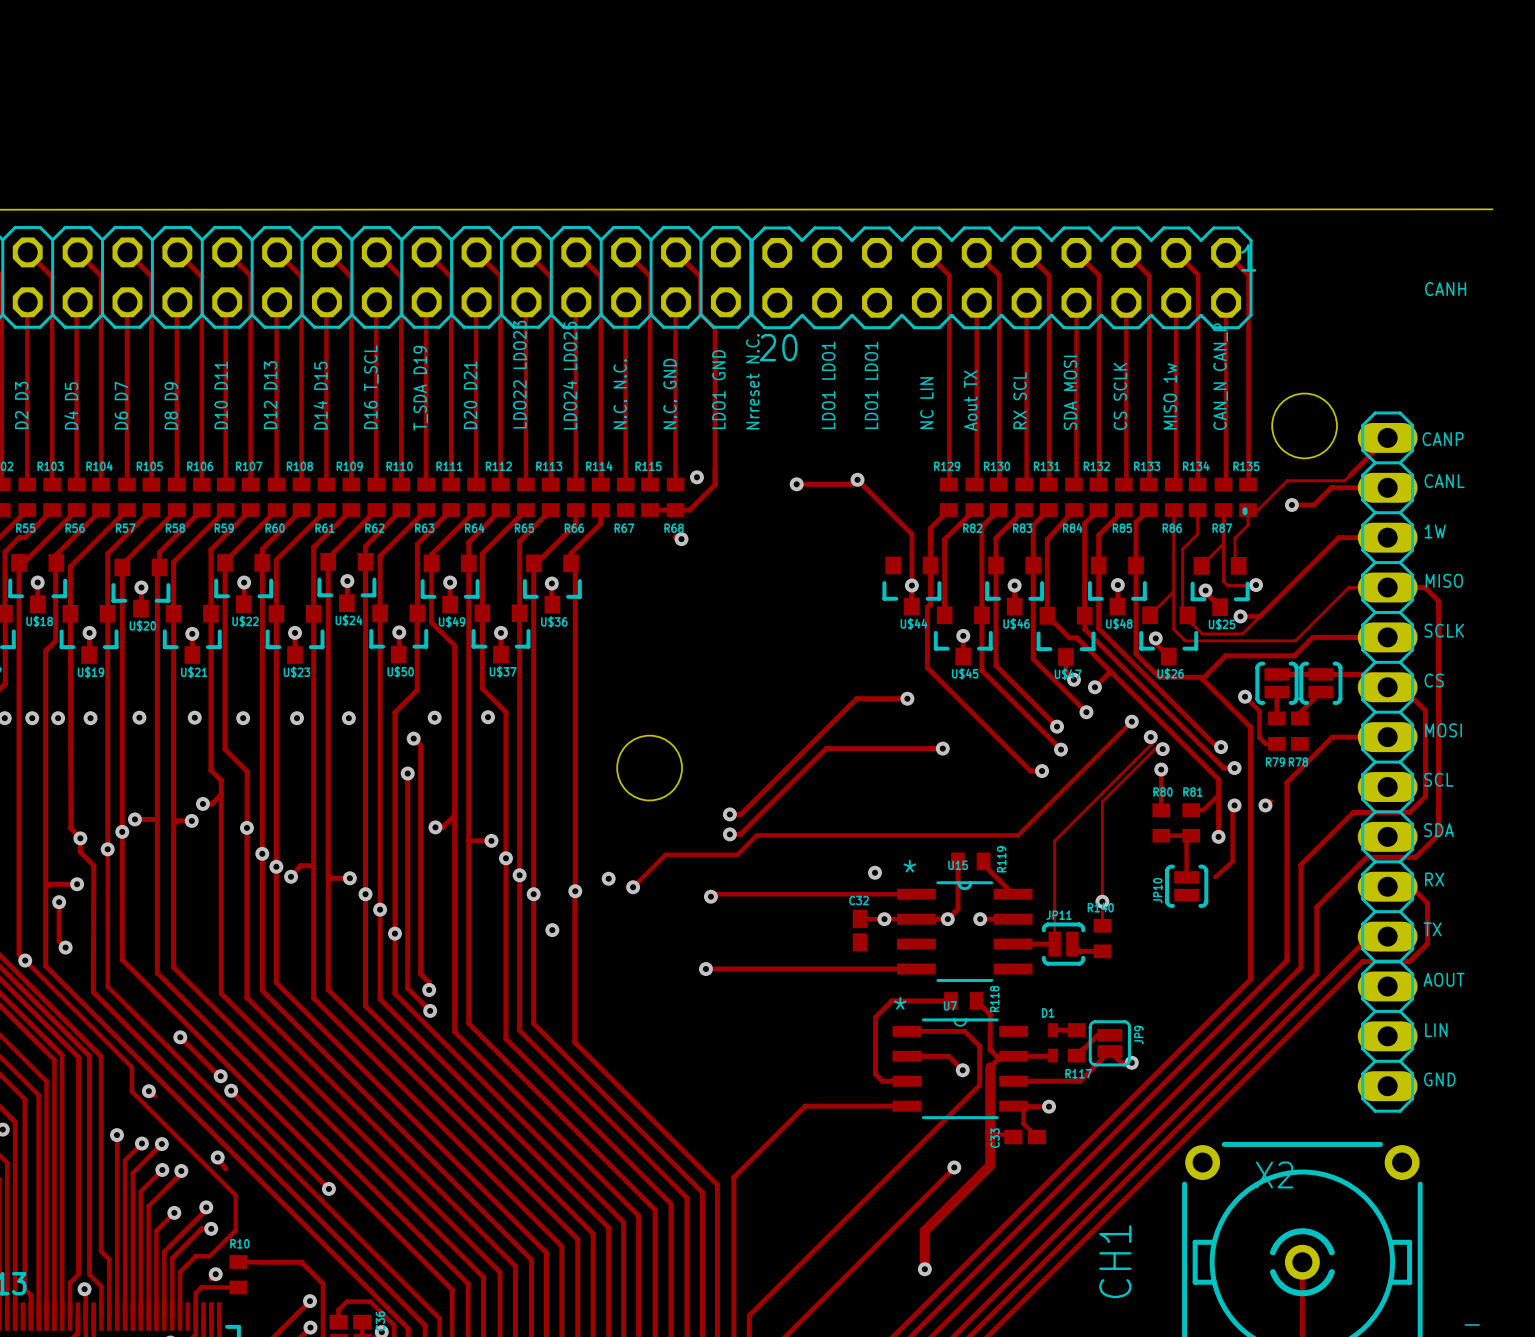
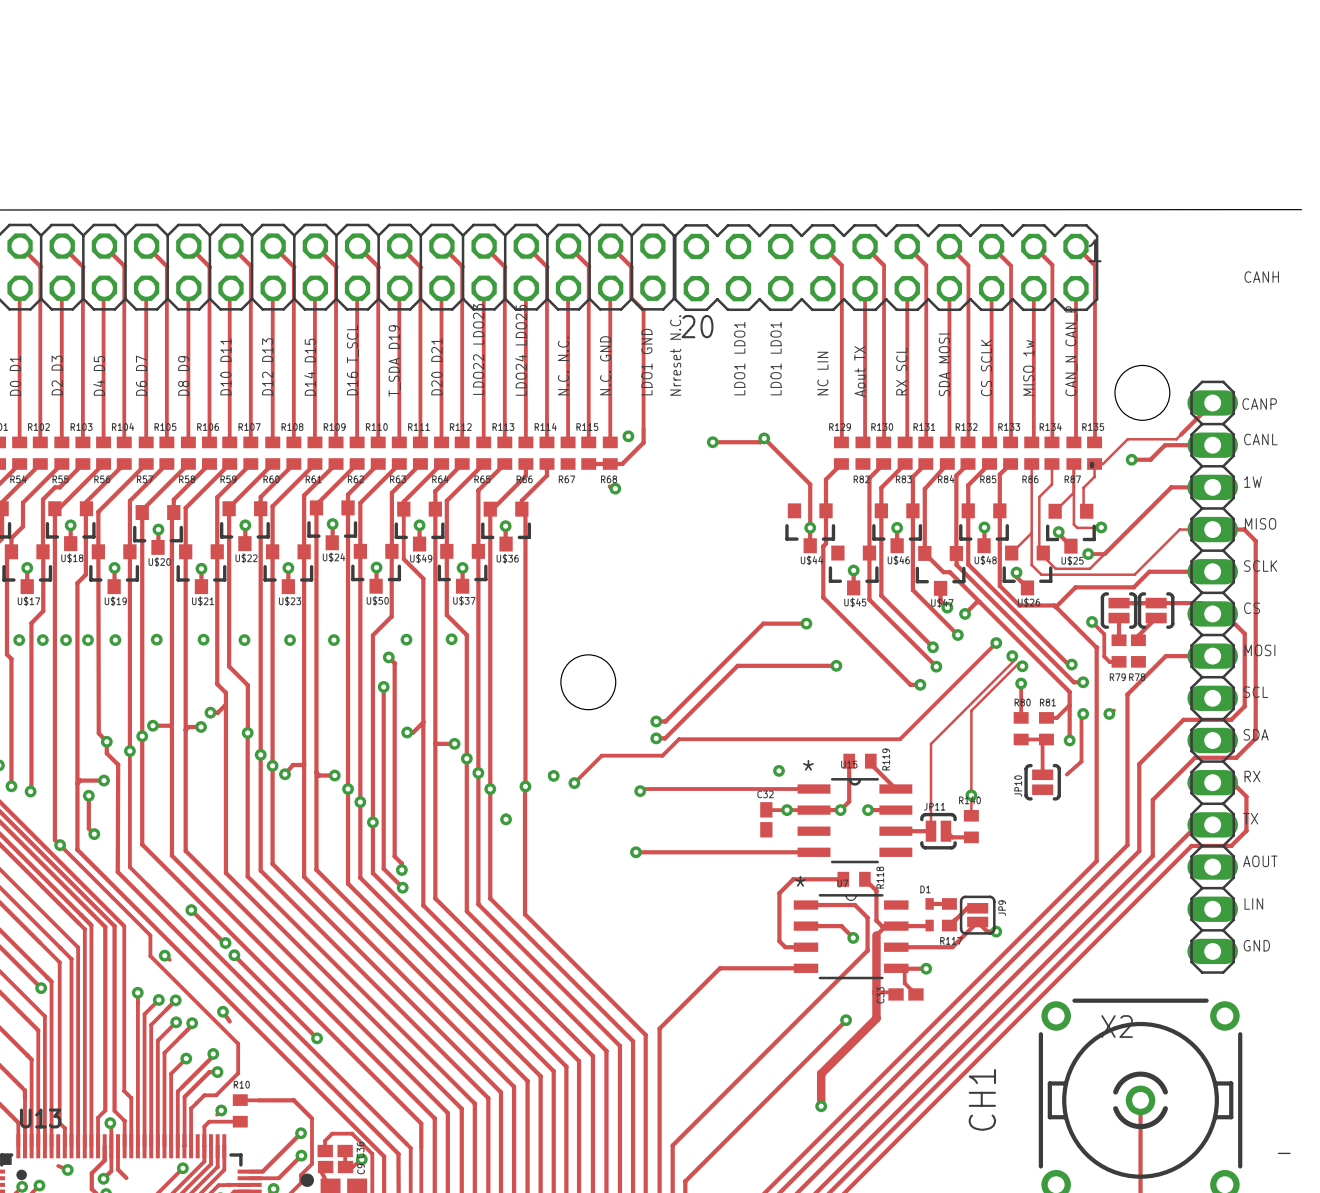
track: (974, 510) (944, 539) (944, 615) -> none

